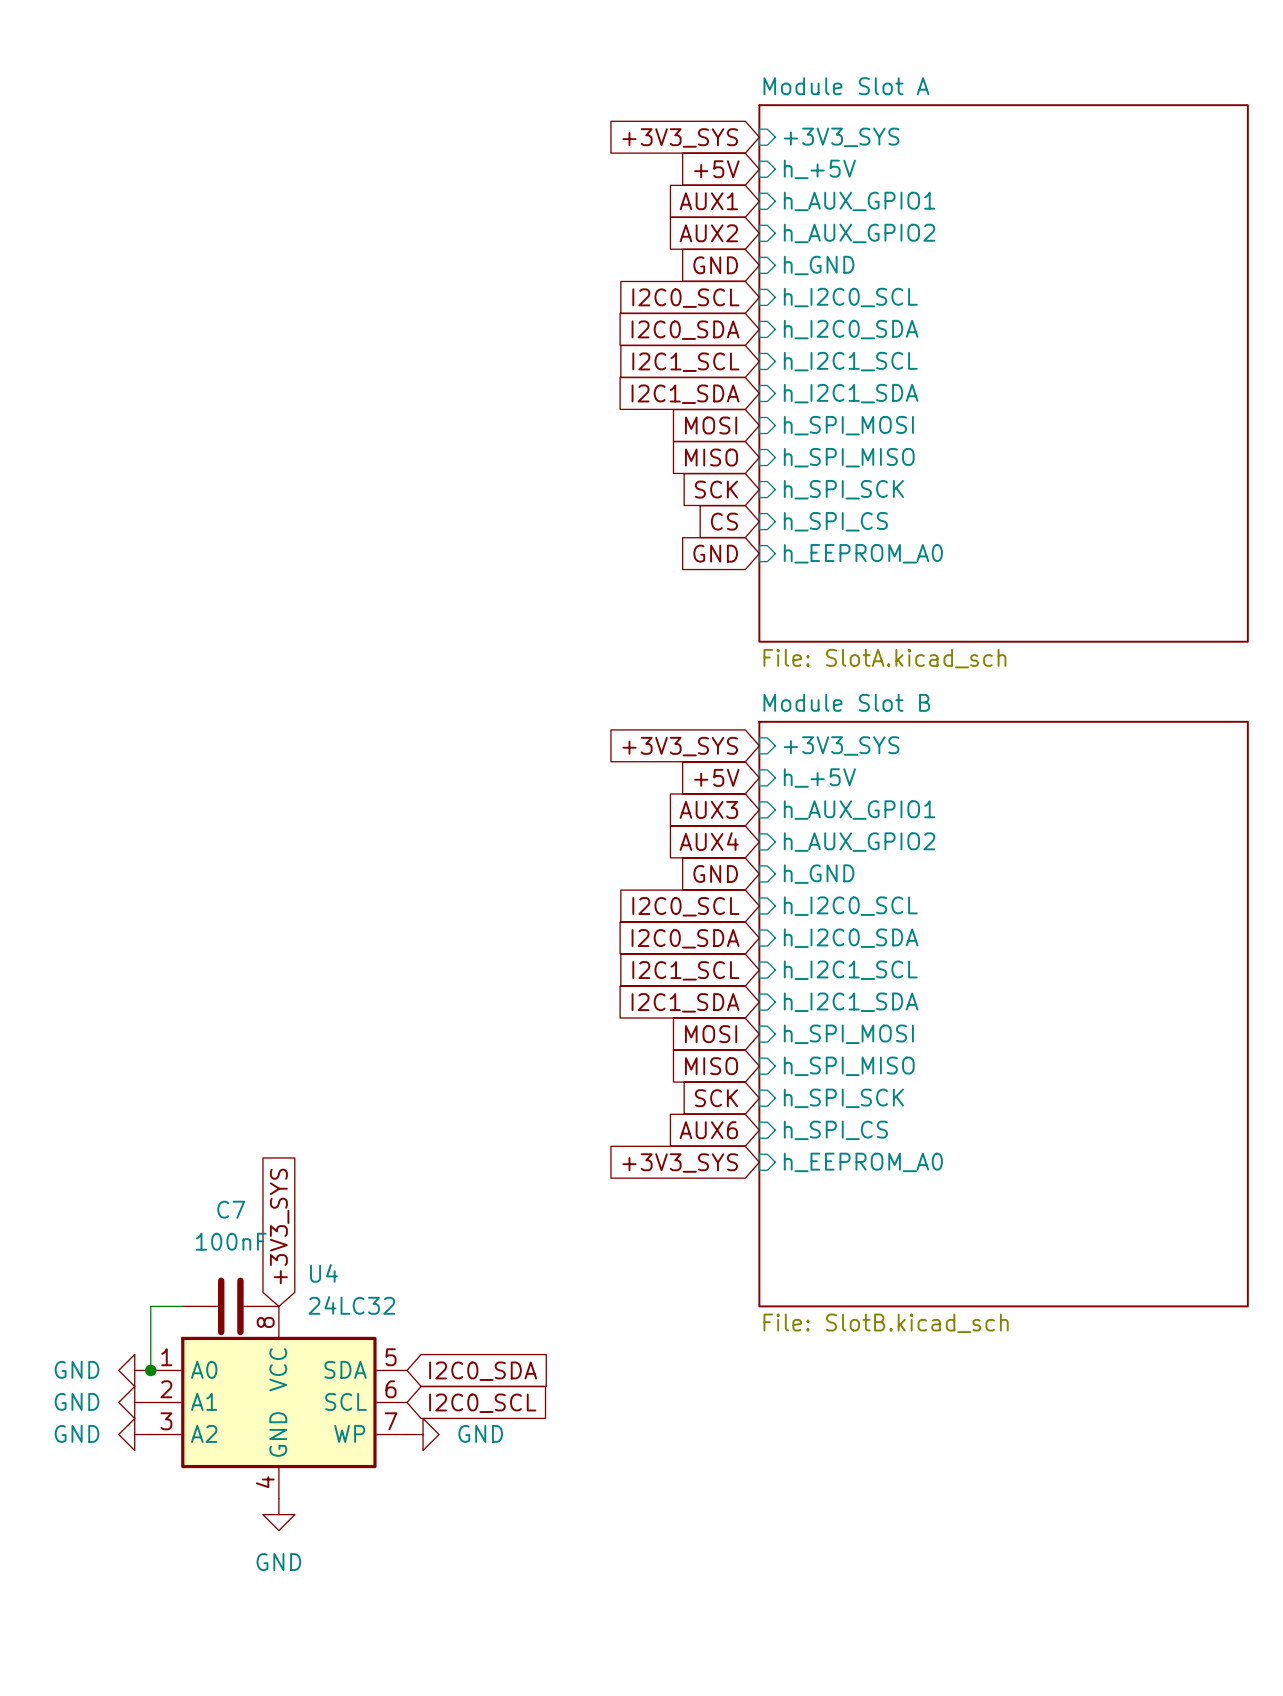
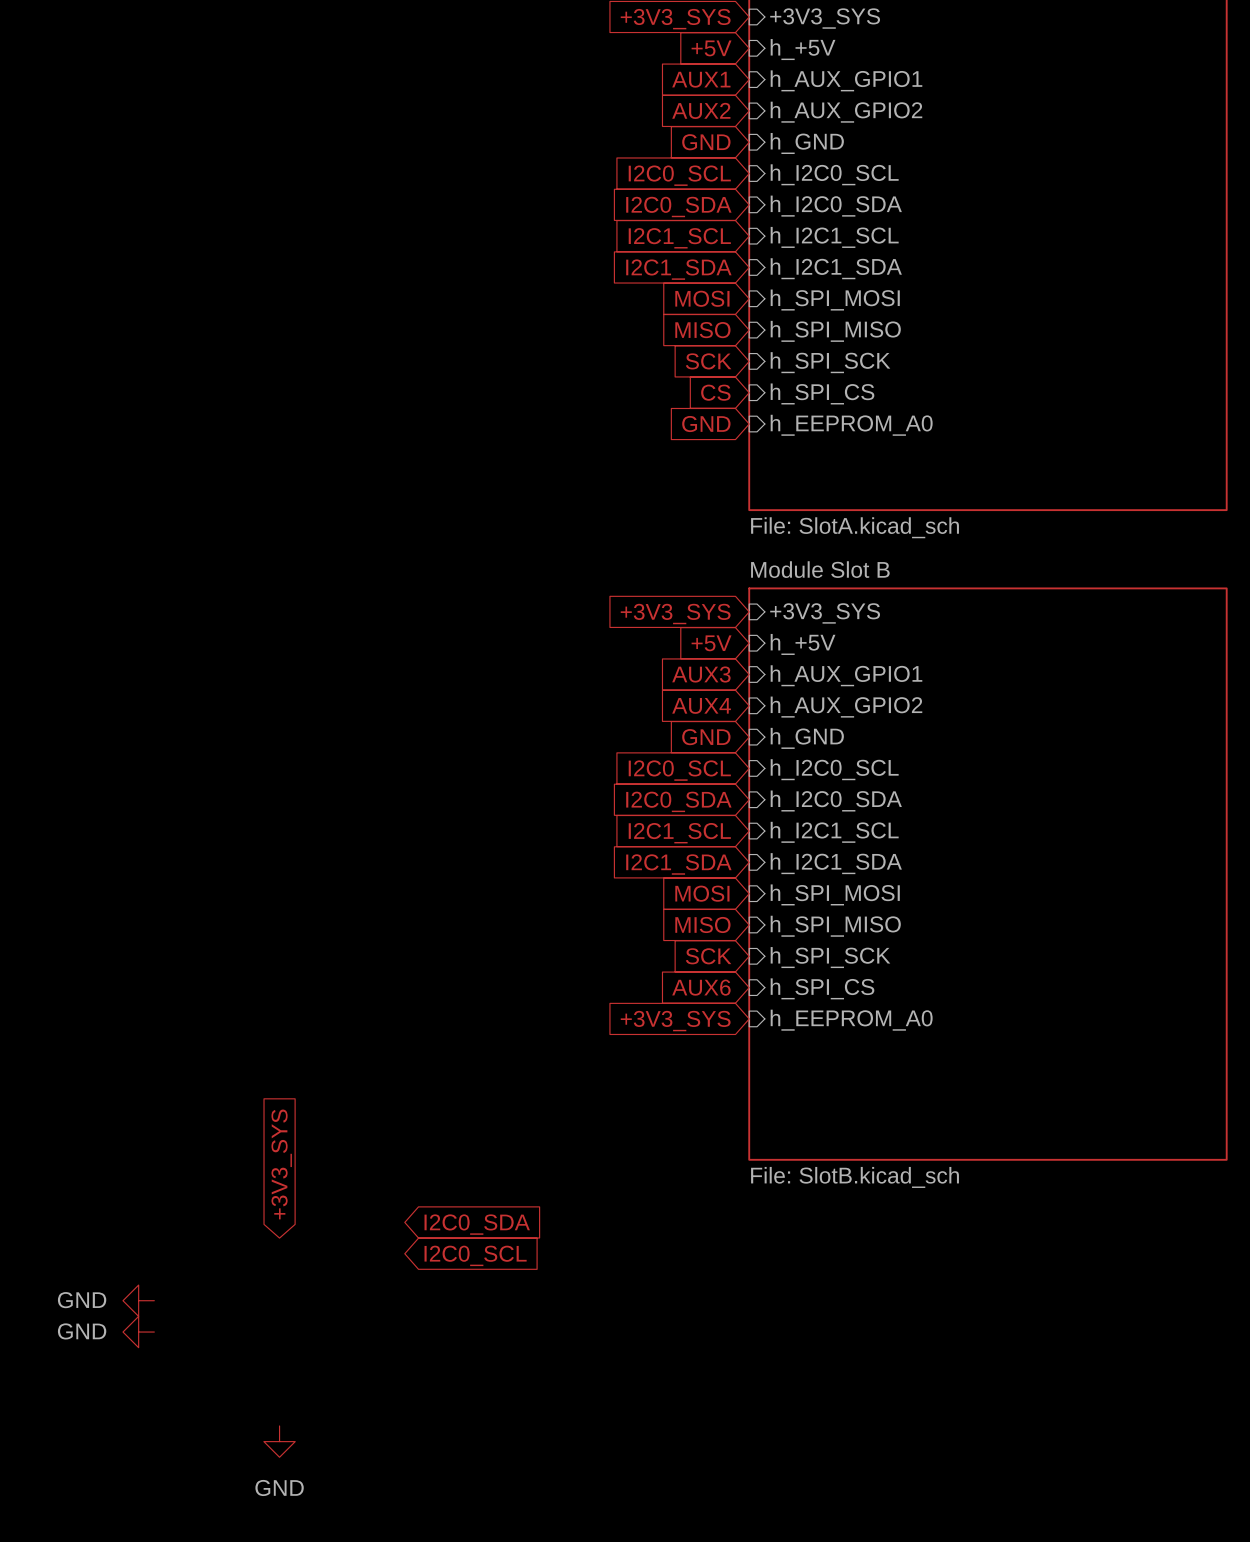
global label position: +3V3_SYS (279, 1226) -> +3V3_SYS (281, 1164)
wire: (182, 1306) (150, 1306) (150, 1370) -> none
C7: 100nF (230, 1306) -> none
power symbol: GND (134, 1370) -> none
junction: (150, 1370) -> none
power symbol: GND (134, 1402) -> none
U4: 24LC32 (278, 1402) -> none
power symbol position: GND (134, 1434) -> GND (138, 1300)
power symbol: GND (423, 1434) -> none
power symbol: none -> GND (138, 1332)
power symbol: GND (278, 1514) -> none
power symbol: none -> GND (279, 1441)

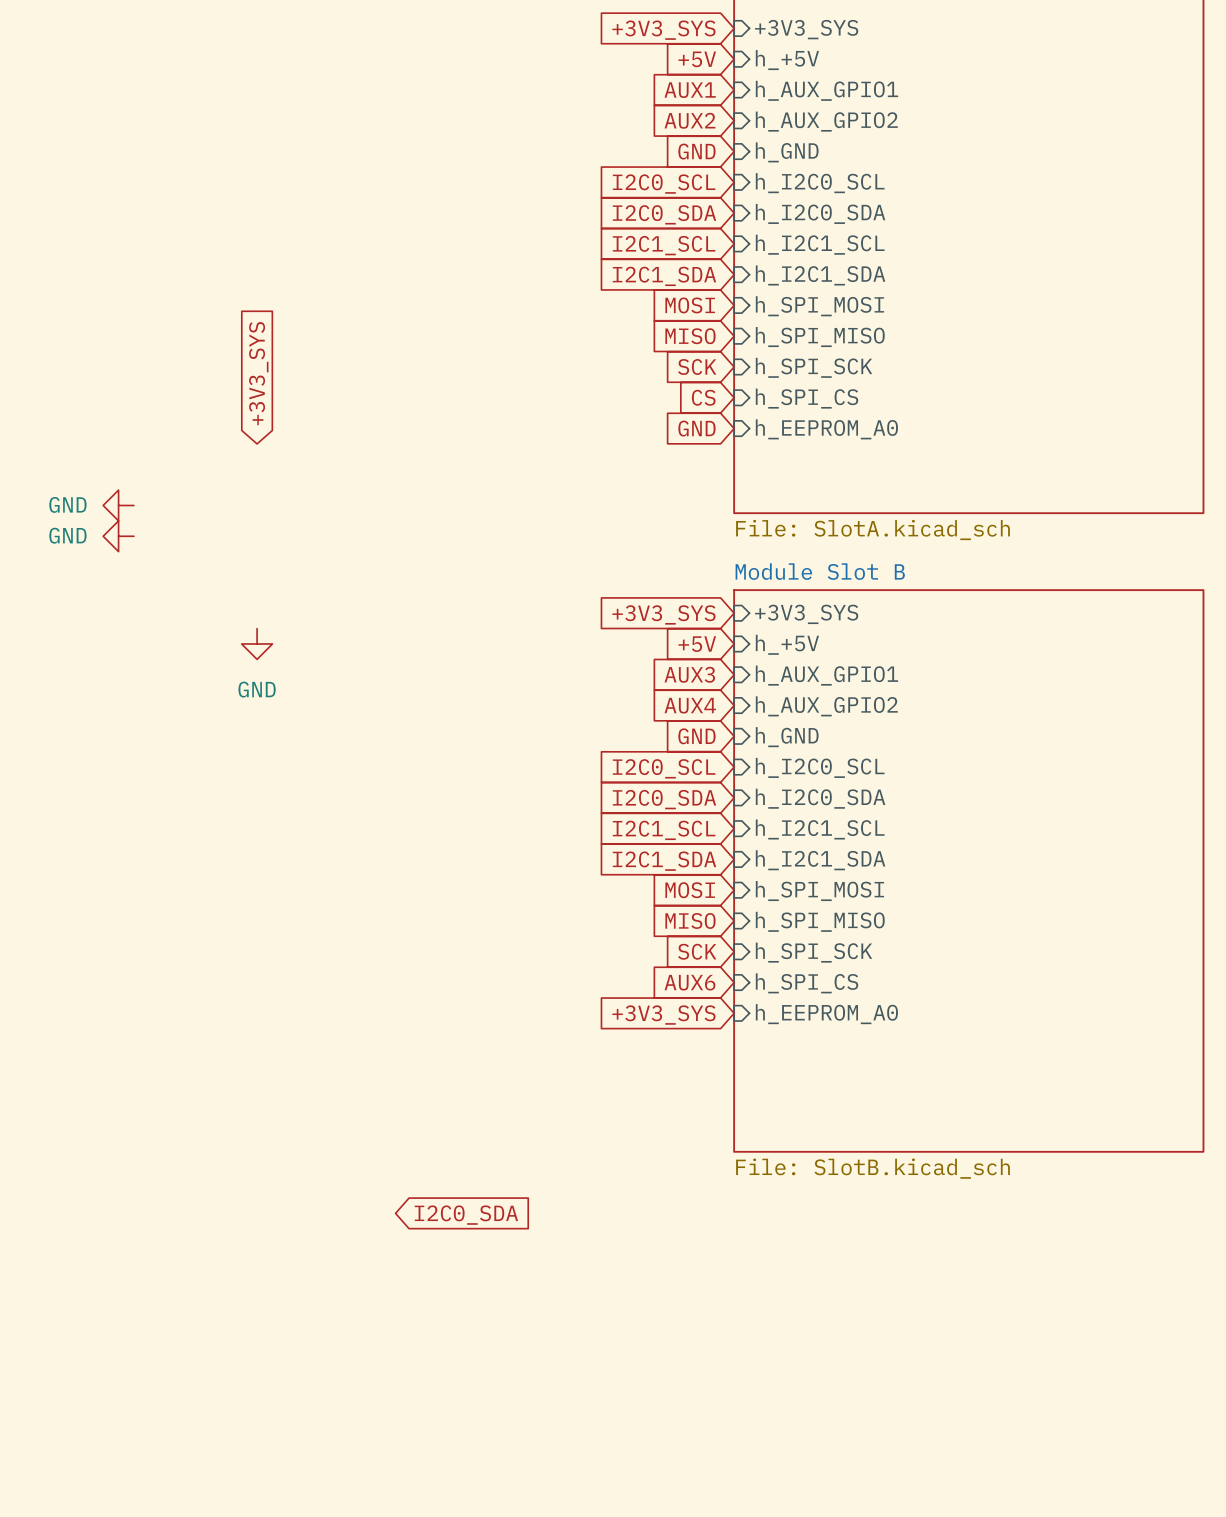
global label: none -> +3V3_SYS (258, 373)
power symbol: none -> GND (118, 505)
power symbol: none -> GND (118, 536)
power symbol: none -> GND (257, 643)
global label: +3V3_SYS (281, 1164) -> none
global label: I2C0_SCL (475, 1255) -> none
power symbol: GND (138, 1300) -> none
power symbol: GND (138, 1332) -> none
power symbol: GND (279, 1441) -> none

